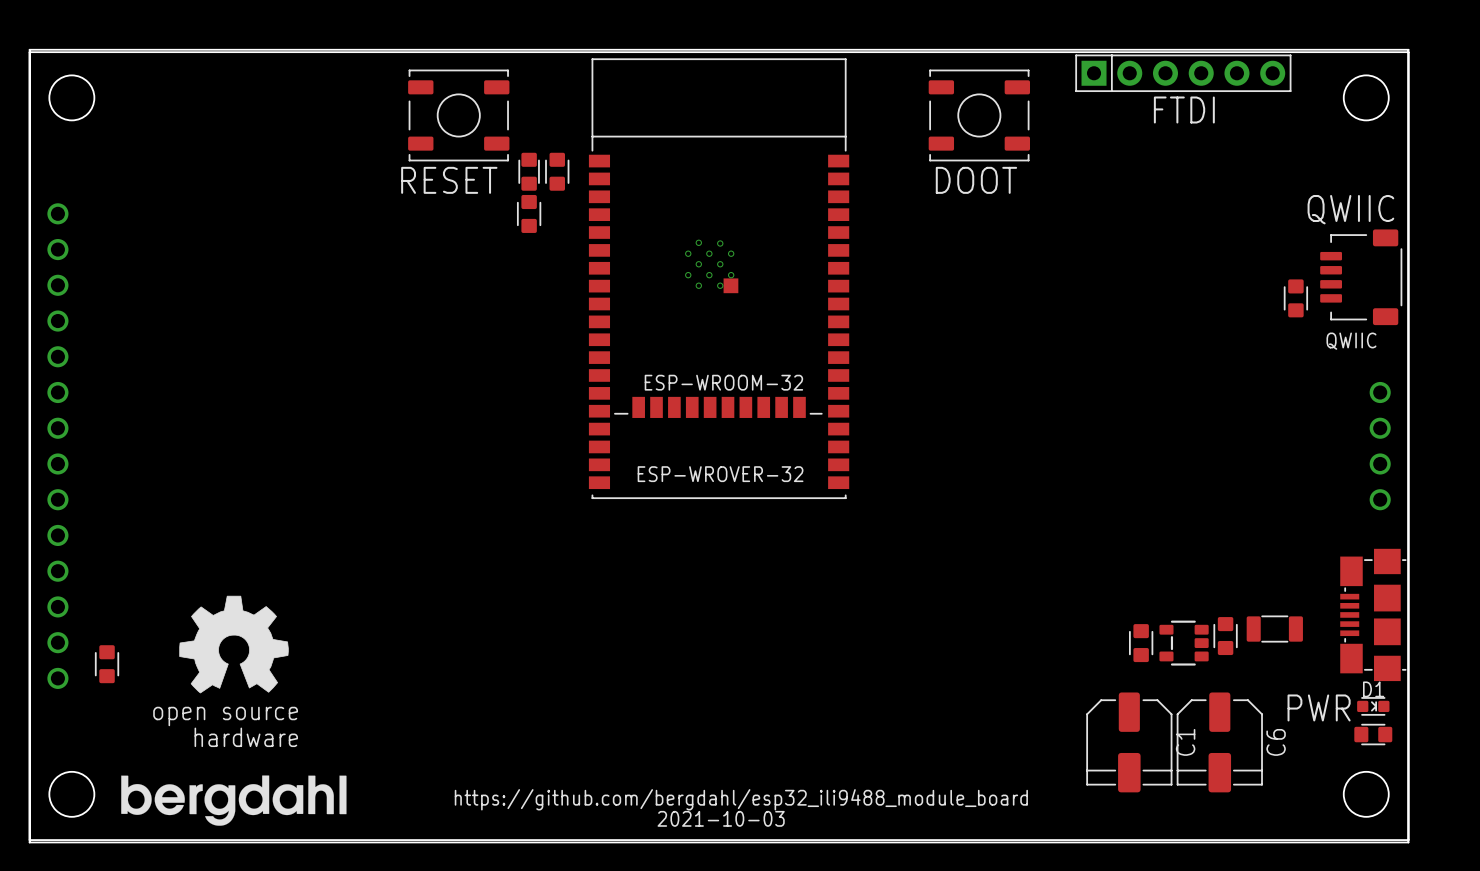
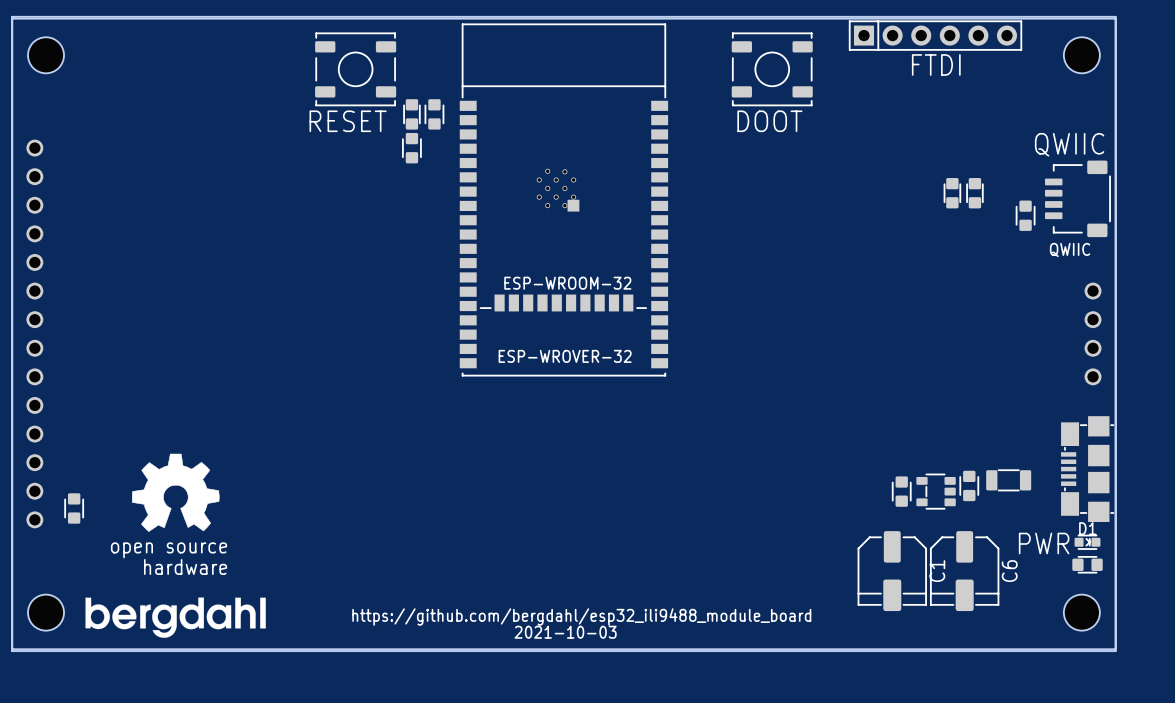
part: none -> (952, 193)
part: none -> (974, 193)

